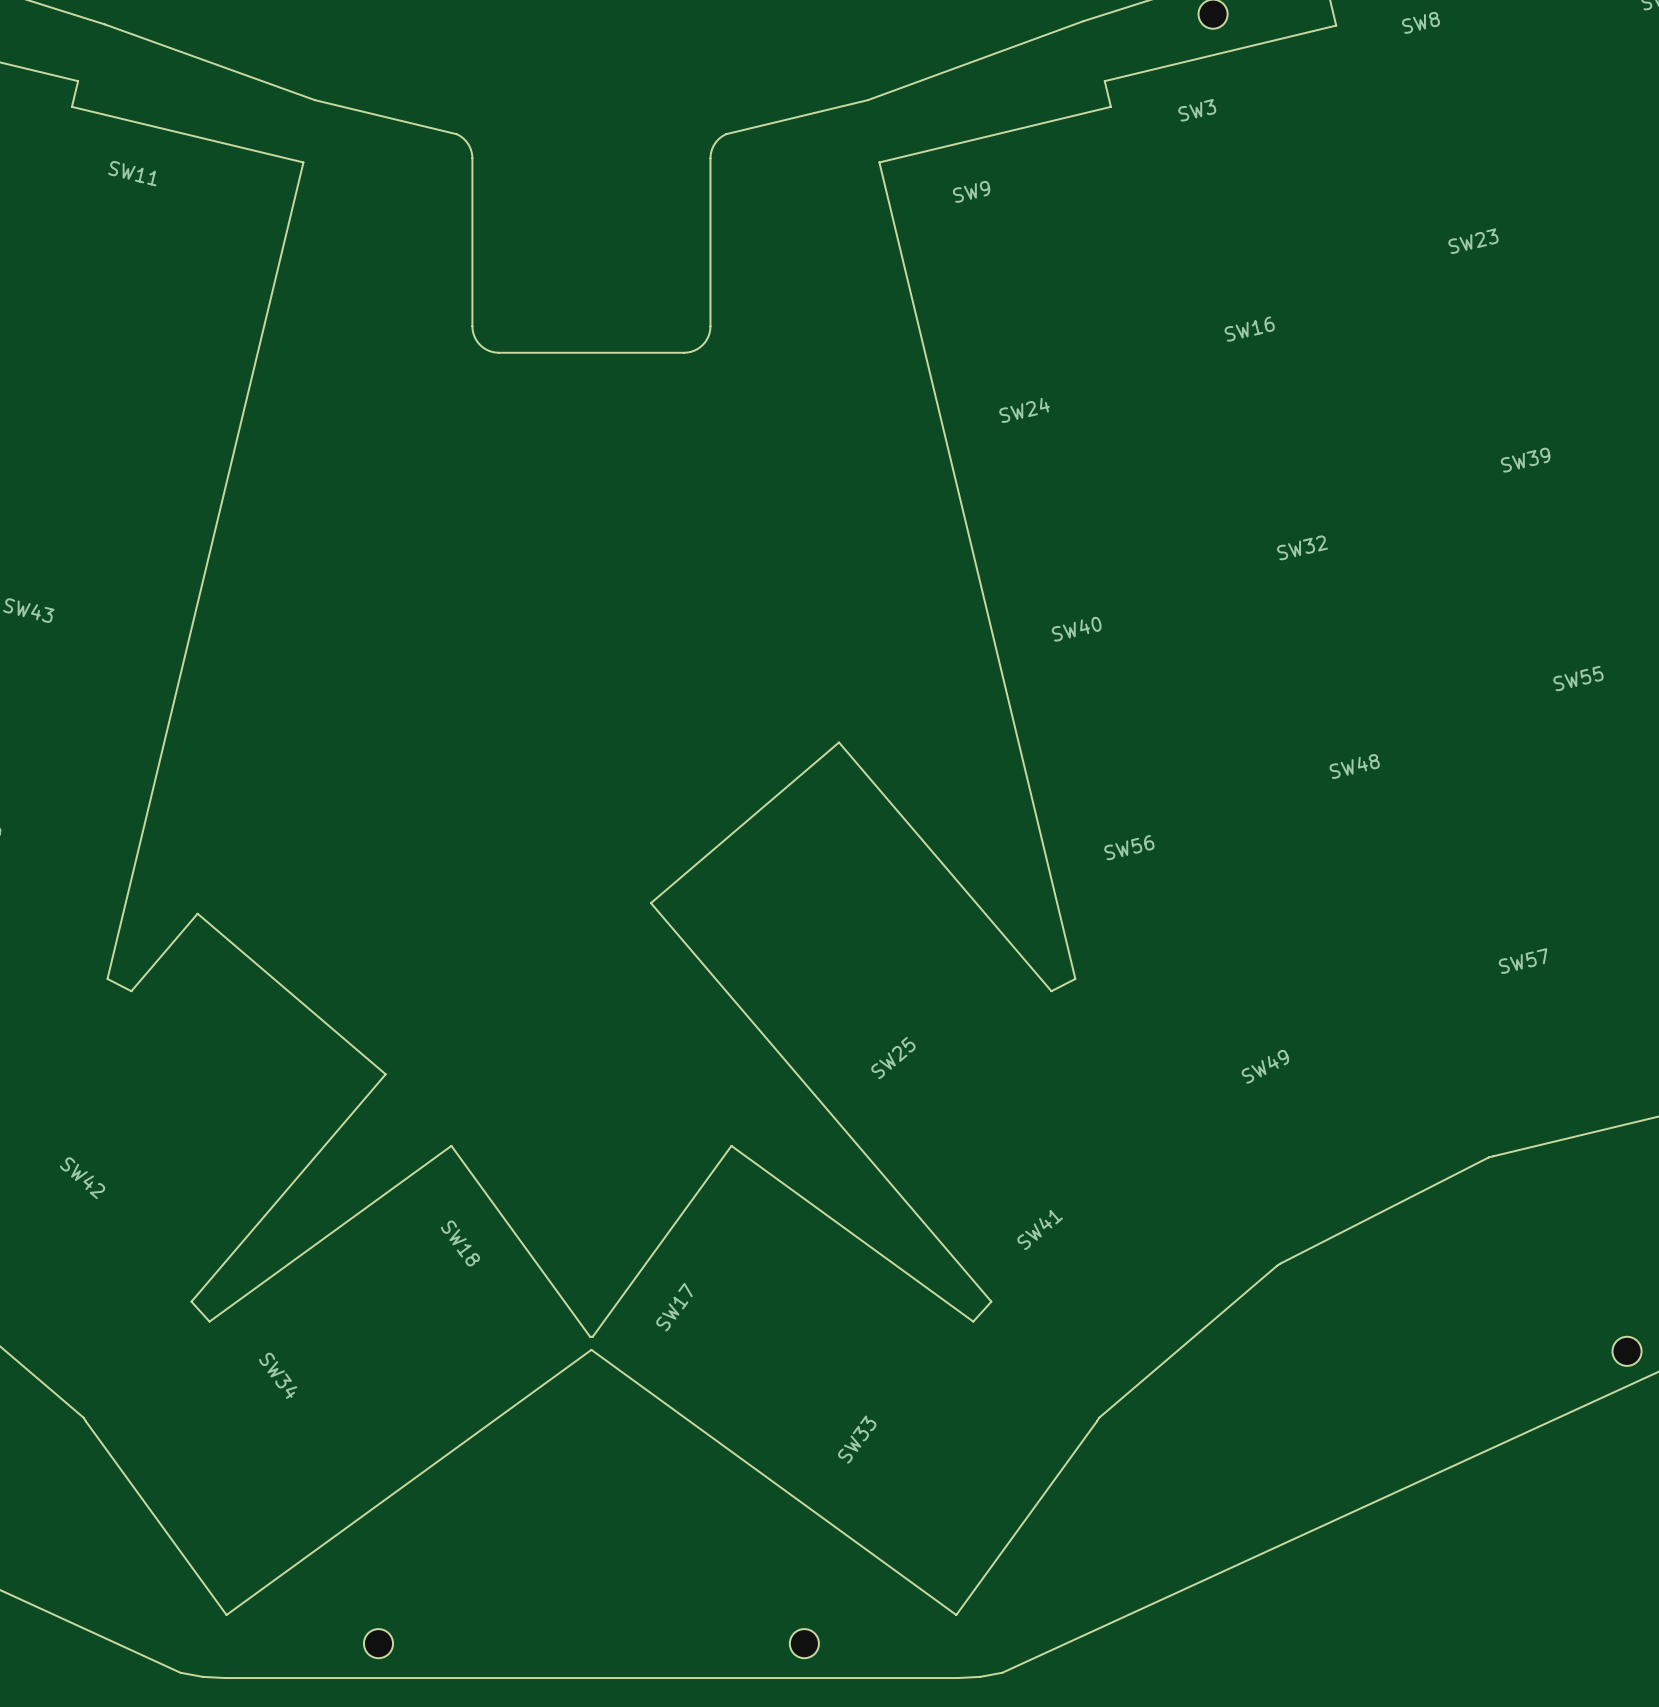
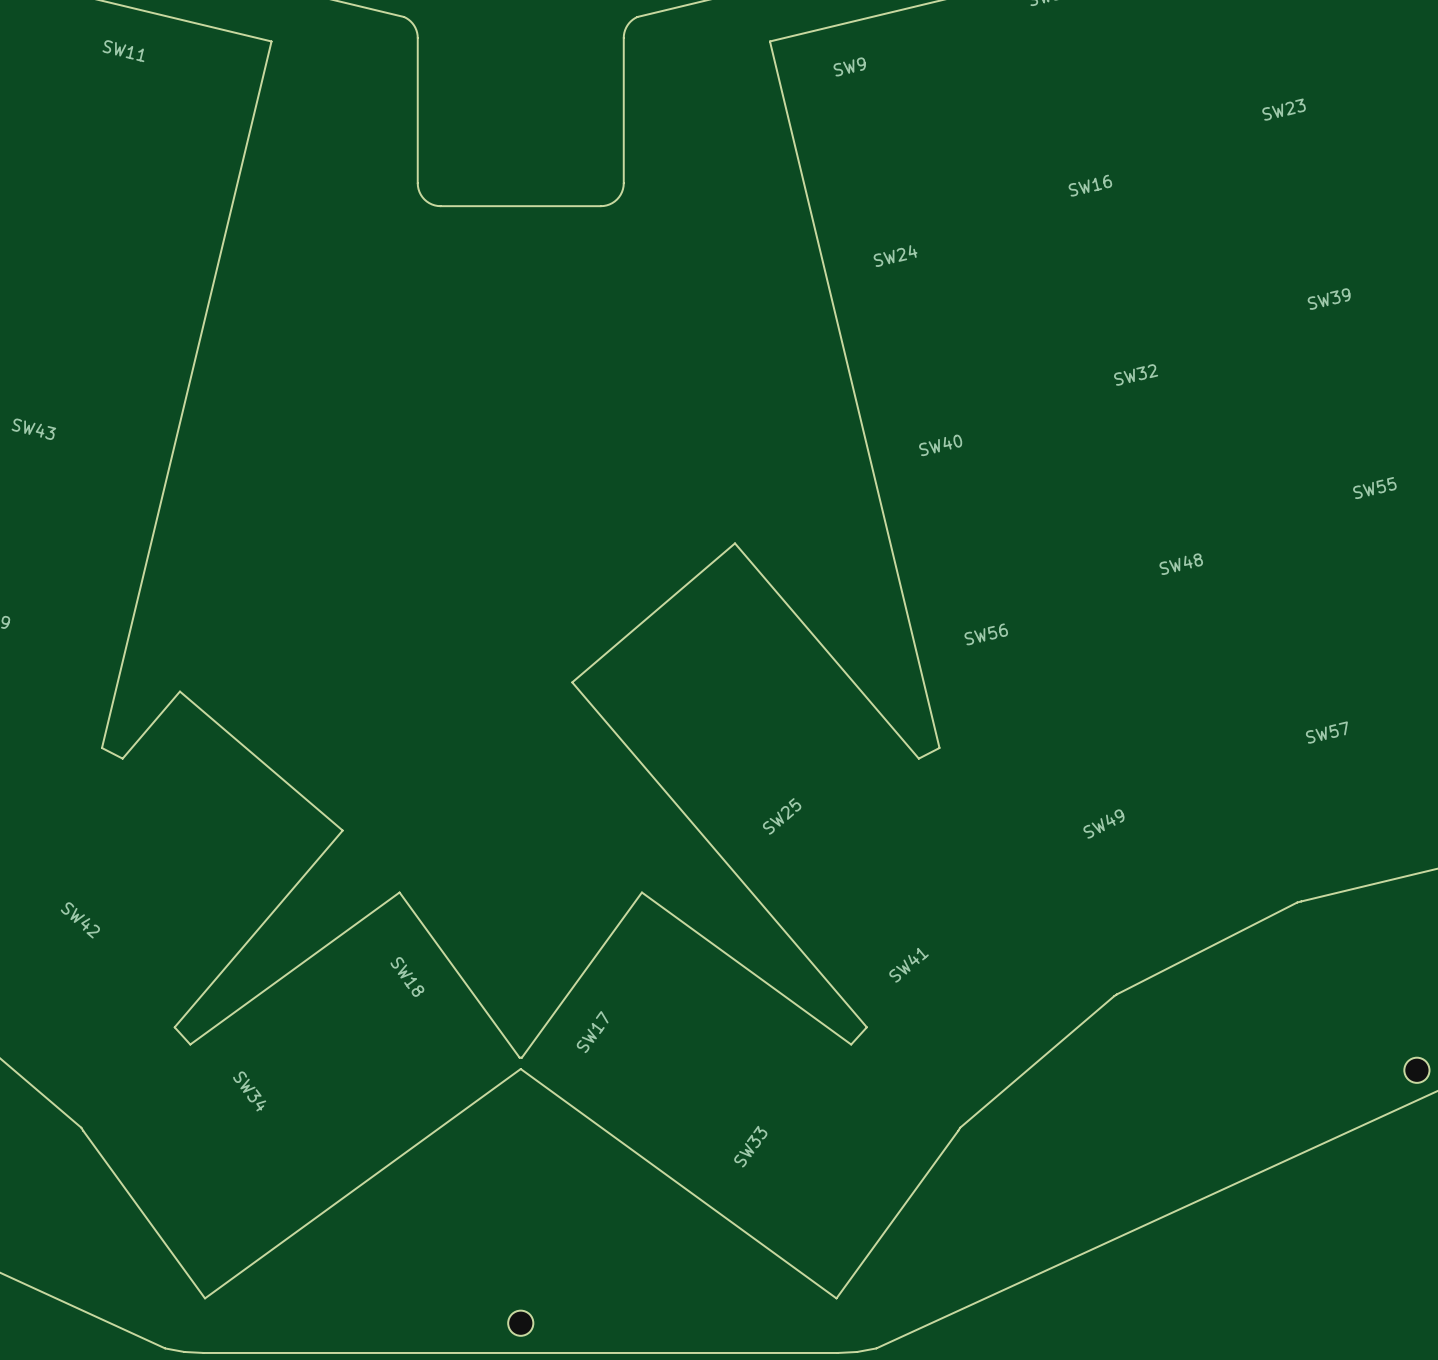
part: (378, 1643) -> none
part position: (804, 1643) -> (520, 1323)

